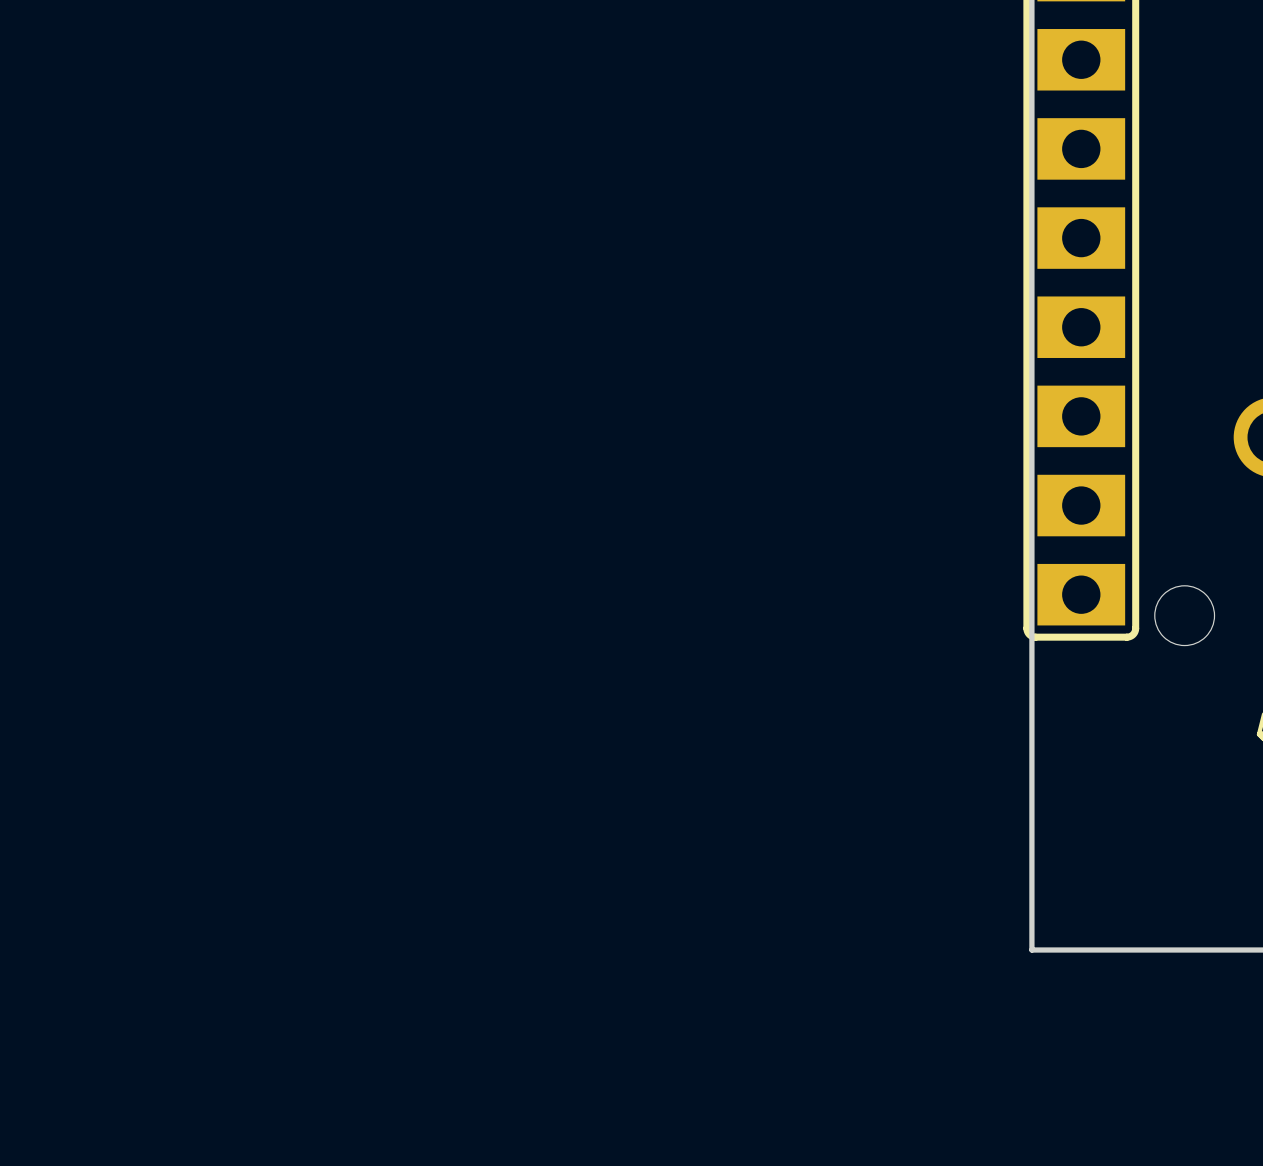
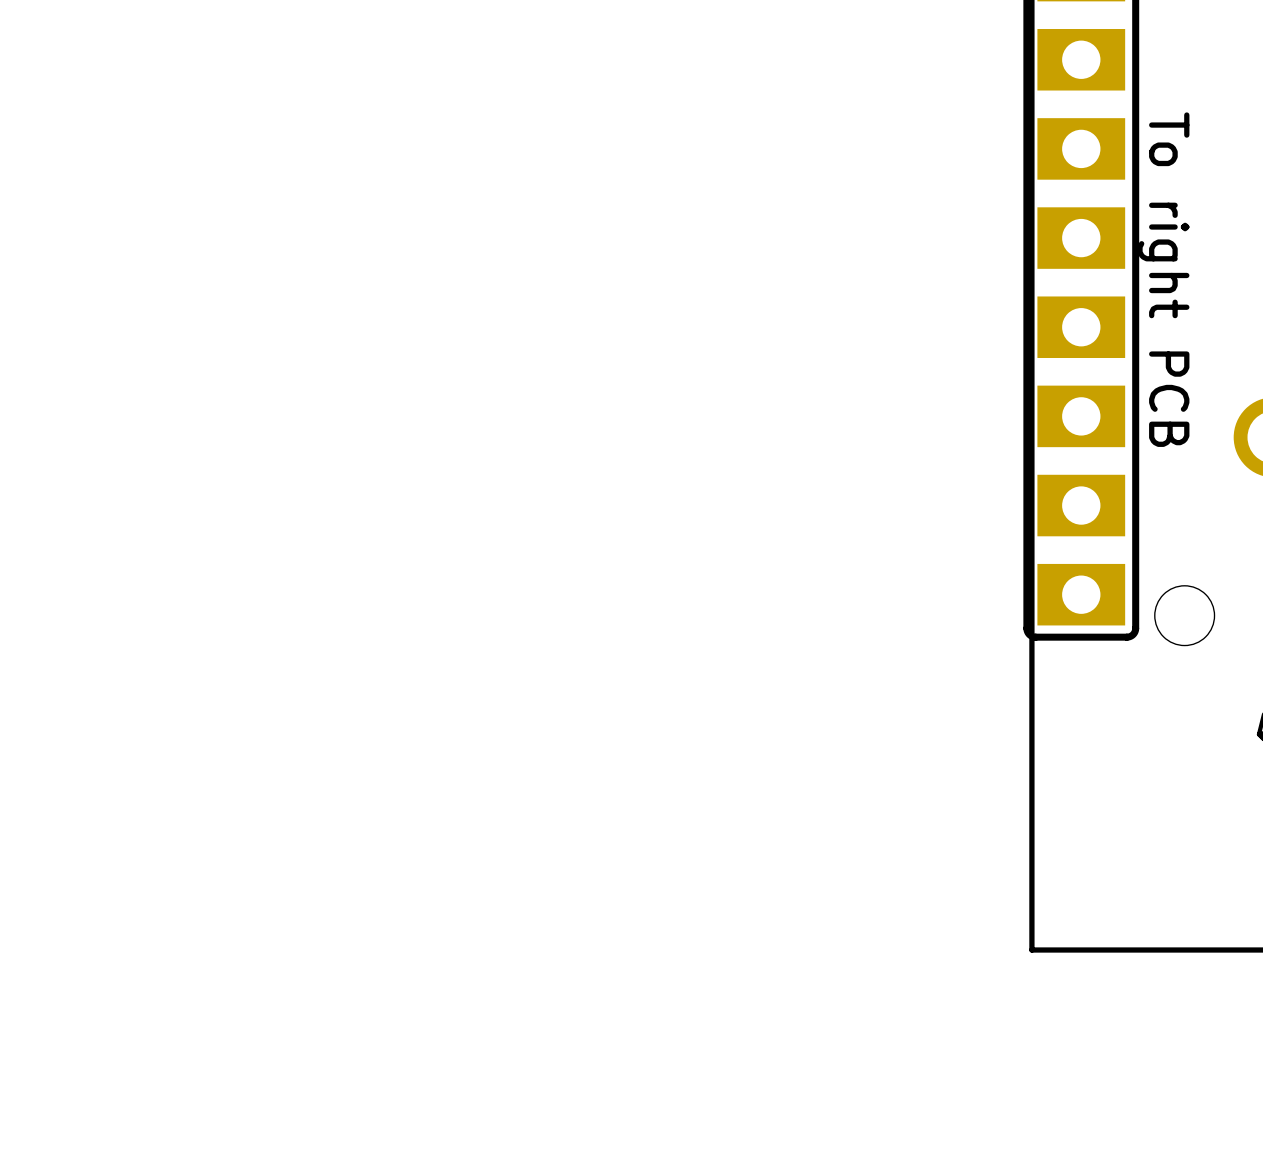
text: none -> To right PCB (1163, 279)

